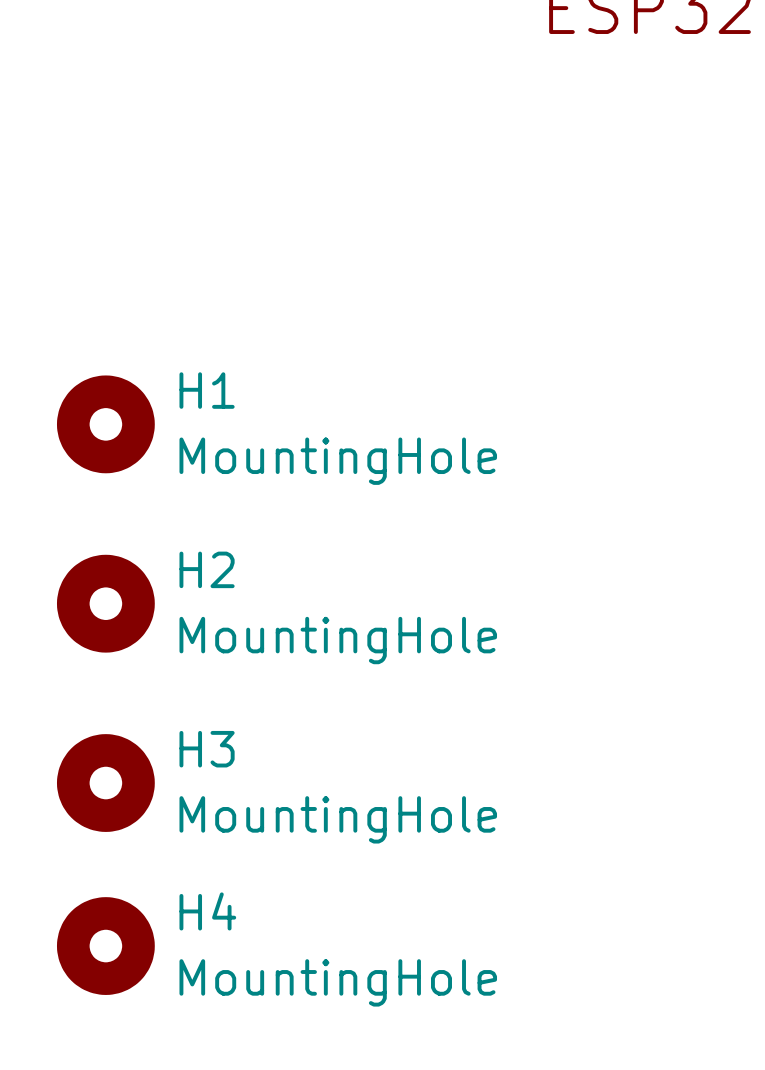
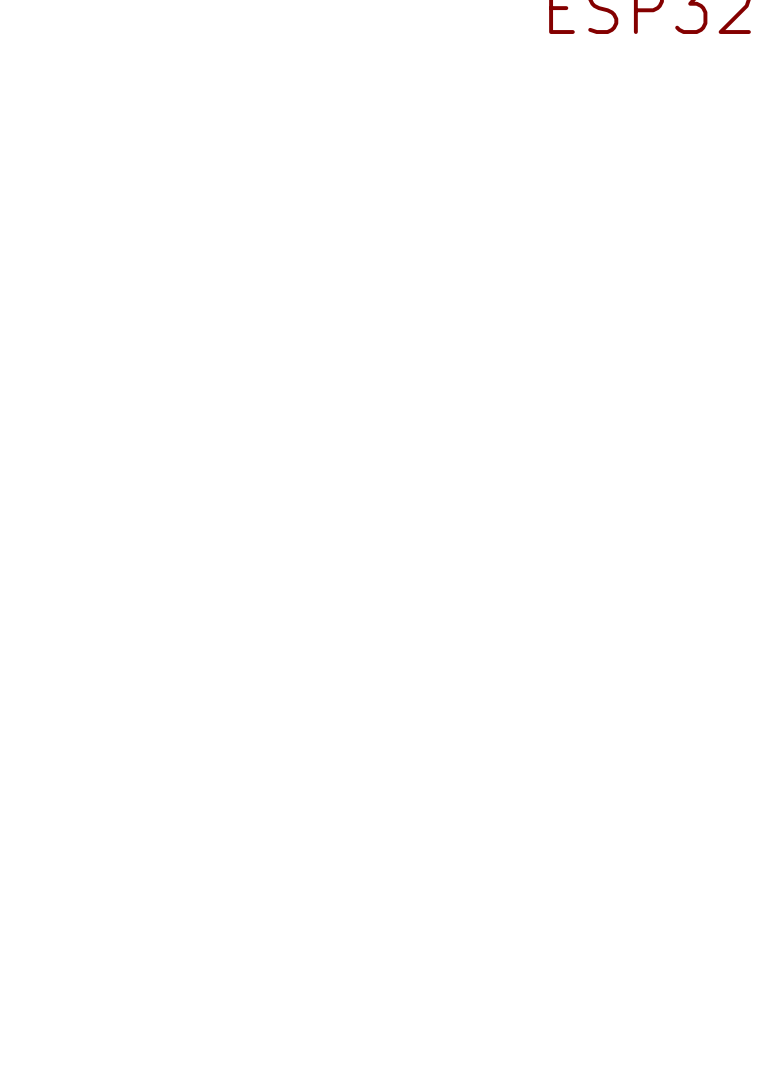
H1: MountingHole (105, 424) -> none
H2: MountingHole (105, 603) -> none
H3: MountingHole (105, 783) -> none
H4: MountingHole (105, 946) -> none

